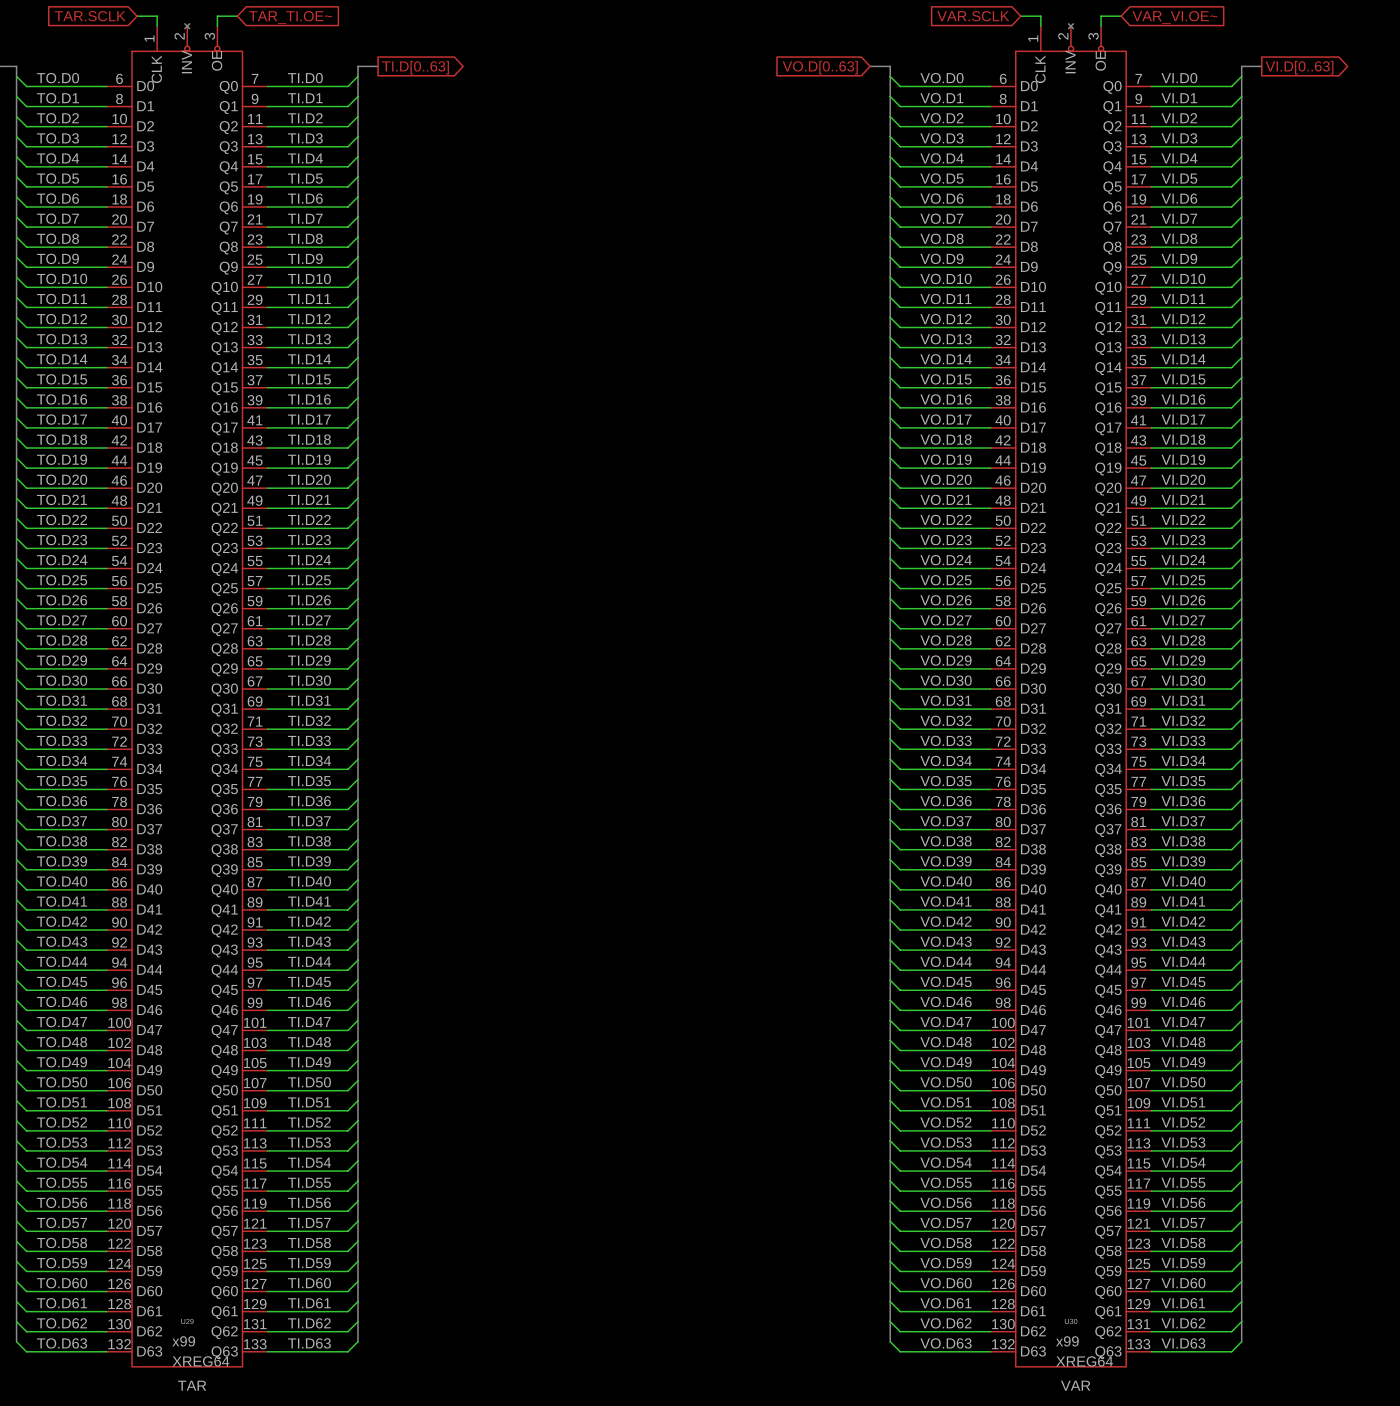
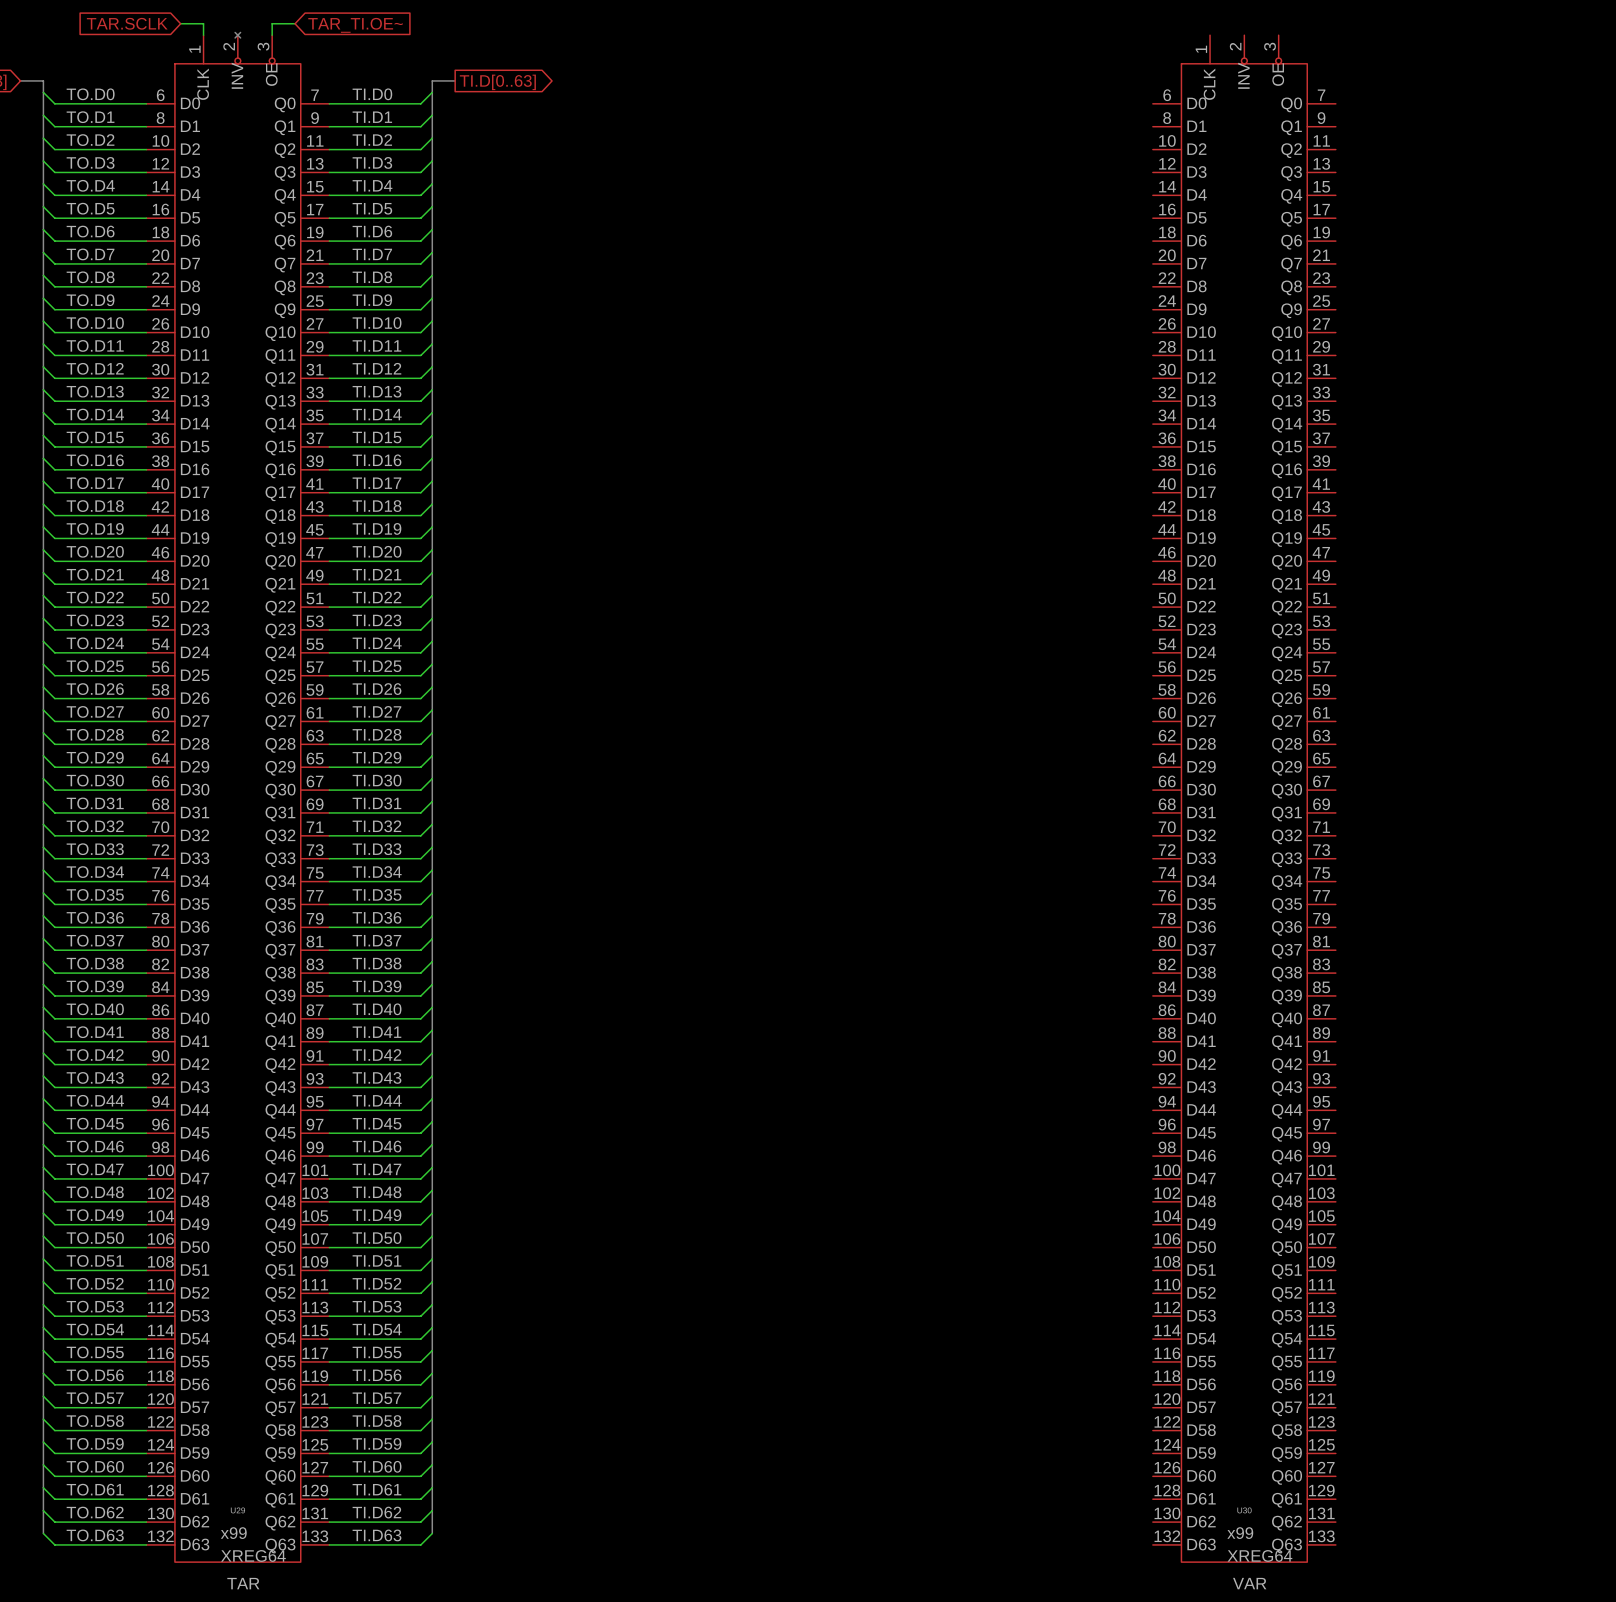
global label: VAR.SCLK (973, 16) -> none
wire: (1020, 16) (1040, 16) (1040, 26) -> none
wire: (1121, 16) (1101, 16) (1101, 26) -> none
global label: VAR_VI.OE~ (1174, 17) -> none
no-connect mark: (1070, 26) -> none
bus: (870, 66) (890, 66) (890, 1341) -> none
bus: (1261, 66) (1241, 66) (1241, 1341) -> none
global label: VO.D[0..63] (820, 67) -> none
global label: VI.D[0..63] (1299, 67) -> none
wire: (890, 76) (900, 86) (990, 86) -> none
wire: (1241, 76) (1231, 86) (1151, 86) -> none
label: VO.D0 (941, 78) -> none
label: VI.D0 (1179, 78) -> none
wire: (890, 96) (900, 106) (990, 106) -> none
wire: (1241, 96) (1231, 106) (1151, 106) -> none
label: VO.D1 (941, 98) -> none
label: VI.D1 (1179, 98) -> none
wire: (890, 116) (900, 126) (990, 126) -> none
wire: (1241, 116) (1231, 126) (1151, 126) -> none
label: VO.D2 (941, 118) -> none
label: VI.D2 (1179, 118) -> none
wire: (890, 136) (900, 146) (990, 146) -> none
wire: (1241, 136) (1231, 146) (1151, 146) -> none
label: VO.D3 (941, 138) -> none
label: VI.D3 (1179, 138) -> none
wire: (890, 156) (900, 166) (990, 166) -> none
wire: (1241, 156) (1231, 166) (1151, 166) -> none
label: VO.D4 (942, 158) -> none
label: VI.D4 (1179, 158) -> none
wire: (890, 176) (900, 186) (990, 186) -> none
wire: (1241, 176) (1231, 186) (1151, 186) -> none
label: VO.D5 (941, 178) -> none
label: VI.D5 (1179, 178) -> none
wire: (890, 196) (900, 206) (990, 206) -> none
wire: (1241, 196) (1231, 206) (1151, 206) -> none
label: VO.D6 (941, 198) -> none
label: VI.D6 (1179, 198) -> none
wire: (890, 217) (900, 227) (990, 227) -> none
wire: (1241, 217) (1231, 227) (1151, 227) -> none
label: VO.D7 (941, 218) -> none
label: VI.D7 (1179, 218) -> none
wire: (890, 237) (900, 247) (990, 247) -> none
wire: (1241, 237) (1231, 247) (1151, 247) -> none
label: VO.D8 (941, 238) -> none
label: VI.D8 (1179, 238) -> none
wire: (890, 257) (900, 267) (990, 267) -> none
wire: (1241, 257) (1231, 267) (1151, 267) -> none
label: VO.D9 (941, 258) -> none
label: VI.D9 (1179, 258) -> none
wire: (890, 277) (900, 287) (990, 287) -> none
wire: (1241, 277) (1231, 287) (1151, 287) -> none
label: VO.D10 (946, 278) -> none
label: VI.D10 (1183, 278) -> none
wire: (890, 297) (900, 307) (990, 307) -> none
wire: (1241, 297) (1231, 307) (1151, 307) -> none
label: VO.D11 (945, 299) -> none
label: VI.D11 (1183, 299) -> none
wire: (890, 317) (900, 327) (990, 327) -> none
wire: (1241, 317) (1231, 327) (1151, 327) -> none
label: VO.D12 (945, 319) -> none
label: VI.D12 (1183, 319) -> none
wire: (890, 337) (900, 347) (990, 347) -> none
wire: (1241, 337) (1231, 347) (1151, 347) -> none
label: VO.D13 (946, 339) -> none
label: VI.D13 (1183, 339) -> none
wire: (890, 357) (900, 367) (990, 367) -> none
wire: (1241, 357) (1231, 367) (1151, 367) -> none
label: VO.D14 (946, 359) -> none
label: VI.D14 (1183, 359) -> none
wire: (890, 377) (900, 387) (990, 387) -> none
wire: (1241, 377) (1231, 387) (1151, 387) -> none
label: VO.D15 (946, 379) -> none
label: VI.D15 (1183, 379) -> none
wire: (890, 397) (900, 407) (990, 407) -> none
wire: (1241, 397) (1231, 407) (1151, 407) -> none
label: VO.D16 (946, 399) -> none
label: VI.D16 (1183, 399) -> none
wire: (890, 417) (900, 427) (990, 427) -> none
wire: (1241, 417) (1231, 427) (1151, 427) -> none
label: VO.D17 (945, 419) -> none
label: VI.D17 (1183, 419) -> none
wire: (890, 437) (900, 448) (990, 448) -> none
wire: (1241, 437) (1231, 448) (1151, 448) -> none
label: VO.D18 (946, 439) -> none
label: VI.D18 (1183, 439) -> none
wire: (890, 458) (900, 468) (990, 468) -> none
wire: (1241, 458) (1231, 468) (1151, 468) -> none
label: VO.D19 (945, 459) -> none
label: VI.D19 (1183, 459) -> none
wire: (890, 478) (900, 488) (990, 488) -> none
wire: (1241, 478) (1231, 488) (1151, 488) -> none
label: VO.D20 (946, 479) -> none
label: VI.D20 (1183, 479) -> none
wire: (890, 498) (900, 508) (990, 508) -> none
wire: (1241, 498) (1231, 508) (1151, 508) -> none
label: VO.D21 (945, 499) -> none
label: VI.D21 (1183, 499) -> none
wire: (890, 518) (900, 528) (990, 528) -> none
wire: (1241, 518) (1231, 528) (1151, 528) -> none
label: VO.D22 (945, 519) -> none
label: VI.D22 (1183, 519) -> none
wire: (890, 538) (900, 548) (990, 548) -> none
wire: (1241, 538) (1231, 548) (1151, 548) -> none
label: VO.D23 (946, 540) -> none
label: VI.D23 (1183, 540) -> none
wire: (890, 558) (900, 568) (990, 568) -> none
wire: (1241, 558) (1231, 568) (1151, 568) -> none
label: VO.D24 (946, 560) -> none
label: VI.D24 (1183, 560) -> none
wire: (890, 578) (900, 588) (990, 588) -> none
wire: (1241, 578) (1231, 588) (1151, 588) -> none
label: VO.D25 (946, 580) -> none
label: VI.D25 (1183, 580) -> none
wire: (890, 598) (900, 608) (990, 608) -> none
wire: (1241, 598) (1231, 608) (1151, 608) -> none
label: VO.D26 (946, 600) -> none
label: VI.D26 (1183, 600) -> none
wire: (890, 618) (900, 628) (990, 628) -> none
wire: (1241, 618) (1231, 628) (1151, 628) -> none
label: VO.D27 (945, 620) -> none
label: VI.D27 (1183, 620) -> none
wire: (890, 638) (900, 648) (990, 648) -> none
wire: (1241, 638) (1231, 648) (1151, 648) -> none
label: VO.D28 (946, 640) -> none
label: VI.D28 (1183, 640) -> none
wire: (890, 658) (900, 668) (990, 668) -> none
wire: (1241, 658) (1231, 668) (1151, 668) -> none
label: VO.D29 (945, 660) -> none
label: VI.D29 (1183, 660) -> none
wire: (890, 678) (900, 689) (990, 689) -> none
wire: (1241, 678) (1231, 689) (1151, 689) -> none
label: VO.D30 (946, 680) -> none
label: VI.D30 (1183, 680) -> none
wire: (890, 699) (900, 709) (990, 709) -> none
wire: (1241, 699) (1231, 709) (1151, 709) -> none
label: VO.D31 (945, 700) -> none
label: VI.D31 (1183, 700) -> none
wire: (890, 719) (900, 729) (990, 729) -> none
wire: (1241, 719) (1231, 729) (1151, 729) -> none
label: VO.D32 (945, 720) -> none
label: VI.D32 (1183, 720) -> none
wire: (890, 739) (900, 749) (990, 749) -> none
wire: (1241, 739) (1231, 749) (1151, 749) -> none
label: VO.D33 (946, 740) -> none
label: VI.D33 (1183, 740) -> none
wire: (890, 759) (900, 769) (990, 769) -> none
wire: (1241, 759) (1231, 769) (1151, 769) -> none
label: VO.D34 (946, 760) -> none
label: VI.D34 (1183, 760) -> none
wire: (890, 779) (900, 789) (990, 789) -> none
wire: (1241, 779) (1231, 789) (1151, 789) -> none
label: VO.D35 (946, 781) -> none
label: VI.D35 (1183, 781) -> none
wire: (890, 799) (900, 809) (990, 809) -> none
wire: (1241, 799) (1231, 809) (1151, 809) -> none
label: VO.D36 (946, 801) -> none
label: VI.D36 (1183, 801) -> none
wire: (890, 819) (900, 829) (990, 829) -> none
wire: (1241, 819) (1231, 829) (1151, 829) -> none
label: VO.D37 (945, 821) -> none
label: VI.D37 (1183, 821) -> none
wire: (890, 839) (900, 849) (990, 849) -> none
wire: (1241, 839) (1231, 849) (1151, 849) -> none
label: VO.D38 (946, 841) -> none
label: VI.D38 (1183, 841) -> none
wire: (890, 859) (900, 869) (990, 869) -> none
wire: (1241, 859) (1231, 869) (1151, 869) -> none
label: VO.D39 (945, 861) -> none
label: VI.D39 (1183, 861) -> none
wire: (890, 879) (900, 889) (990, 889) -> none
wire: (1241, 879) (1231, 889) (1151, 889) -> none
label: VO.D40 (946, 881) -> none
label: VI.D40 (1183, 881) -> none
wire: (890, 899) (900, 909) (990, 909) -> none
wire: (1241, 899) (1231, 909) (1151, 909) -> none
label: VO.D41 (945, 901) -> none
label: VI.D41 (1183, 901) -> none
wire: (890, 919) (900, 930) (990, 930) -> none
wire: (1241, 919) (1231, 930) (1151, 930) -> none
label: VO.D42 (945, 921) -> none
label: VI.D42 (1183, 921) -> none
wire: (890, 940) (900, 950) (990, 950) -> none
wire: (1241, 940) (1231, 950) (1151, 950) -> none
label: VO.D43 (946, 941) -> none
label: VI.D43 (1183, 941) -> none
wire: (890, 960) (900, 970) (990, 970) -> none
wire: (1241, 960) (1231, 970) (1151, 970) -> none
label: VO.D44 (946, 961) -> none
label: VI.D44 (1183, 961) -> none
wire: (890, 980) (900, 990) (990, 990) -> none
wire: (1241, 980) (1231, 990) (1151, 990) -> none
label: VO.D45 (946, 981) -> none
label: VI.D45 (1183, 981) -> none
wire: (890, 1000) (900, 1010) (990, 1010) -> none
wire: (1241, 1000) (1231, 1010) (1151, 1010) -> none
label: VO.D46 (946, 1001) -> none
label: VI.D46 (1183, 1001) -> none
wire: (890, 1020) (900, 1030) (990, 1030) -> none
wire: (1241, 1020) (1231, 1030) (1151, 1030) -> none
label: VO.D47 (945, 1022) -> none
label: VI.D47 (1183, 1022) -> none
wire: (890, 1040) (900, 1050) (990, 1050) -> none
wire: (1241, 1040) (1231, 1050) (1151, 1050) -> none
label: VO.D48 (946, 1042) -> none
label: VI.D48 (1183, 1042) -> none
wire: (890, 1060) (900, 1070) (990, 1070) -> none
wire: (1241, 1060) (1231, 1070) (1151, 1070) -> none
label: VO.D49 (945, 1062) -> none
label: VI.D49 (1183, 1062) -> none
wire: (890, 1080) (900, 1090) (990, 1090) -> none
wire: (1241, 1080) (1231, 1090) (1151, 1090) -> none
label: VO.D50 (946, 1082) -> none
label: VI.D50 (1183, 1082) -> none
wire: (890, 1100) (900, 1110) (990, 1110) -> none
wire: (1241, 1100) (1231, 1110) (1151, 1110) -> none
label: VO.D51 (945, 1102) -> none
label: VI.D51 (1183, 1102) -> none
wire: (890, 1120) (900, 1130) (990, 1130) -> none
wire: (1241, 1120) (1231, 1130) (1151, 1130) -> none
label: VO.D52 (945, 1122) -> none
label: VI.D52 (1183, 1122) -> none
wire: (890, 1140) (900, 1150) (990, 1150) -> none
wire: (1241, 1140) (1231, 1150) (1151, 1150) -> none
label: VO.D53 (946, 1142) -> none
label: VI.D53 (1183, 1142) -> none
wire: (890, 1160) (900, 1171) (990, 1171) -> none
wire: (1241, 1160) (1231, 1171) (1151, 1171) -> none
label: VO.D54 (946, 1162) -> none
label: VI.D54 (1183, 1162) -> none
wire: (890, 1181) (900, 1191) (990, 1191) -> none
wire: (1241, 1181) (1231, 1191) (1151, 1191) -> none
label: VO.D55 (946, 1182) -> none
label: VI.D55 (1183, 1182) -> none
wire: (890, 1201) (900, 1211) (990, 1211) -> none
wire: (1241, 1201) (1231, 1211) (1151, 1211) -> none
label: VO.D56 (946, 1202) -> none
label: VI.D56 (1183, 1202) -> none
wire: (890, 1221) (900, 1231) (990, 1231) -> none
wire: (1241, 1221) (1231, 1231) (1151, 1231) -> none
label: VO.D57 (945, 1222) -> none
label: VI.D57 (1183, 1222) -> none
wire: (890, 1241) (900, 1251) (990, 1251) -> none
wire: (1241, 1241) (1231, 1251) (1151, 1251) -> none
label: VO.D58 (946, 1243) -> none
label: VI.D58 (1183, 1243) -> none
wire: (890, 1261) (900, 1271) (990, 1271) -> none
wire: (1241, 1261) (1231, 1271) (1151, 1271) -> none
label: VO.D59 (945, 1263) -> none
label: VI.D59 (1183, 1263) -> none
wire: (890, 1281) (900, 1291) (990, 1291) -> none
wire: (1241, 1281) (1231, 1291) (1151, 1291) -> none
label: VO.D60 (946, 1283) -> none
label: VI.D60 (1183, 1283) -> none
wire: (890, 1301) (900, 1311) (990, 1311) -> none
wire: (1241, 1301) (1231, 1311) (1151, 1311) -> none
label: VO.D61 (945, 1303) -> none
label: VI.D61 (1183, 1303) -> none
wire: (890, 1321) (900, 1331) (990, 1331) -> none
wire: (1241, 1321) (1231, 1331) (1151, 1331) -> none
label: VO.D62 (945, 1323) -> none
label: VI.D62 (1183, 1323) -> none
wire: (890, 1341) (900, 1351) (990, 1351) -> none
wire: (1241, 1341) (1231, 1351) (1151, 1351) -> none
label: VO.D63 (946, 1343) -> none
label: VI.D63 (1183, 1343) -> none

